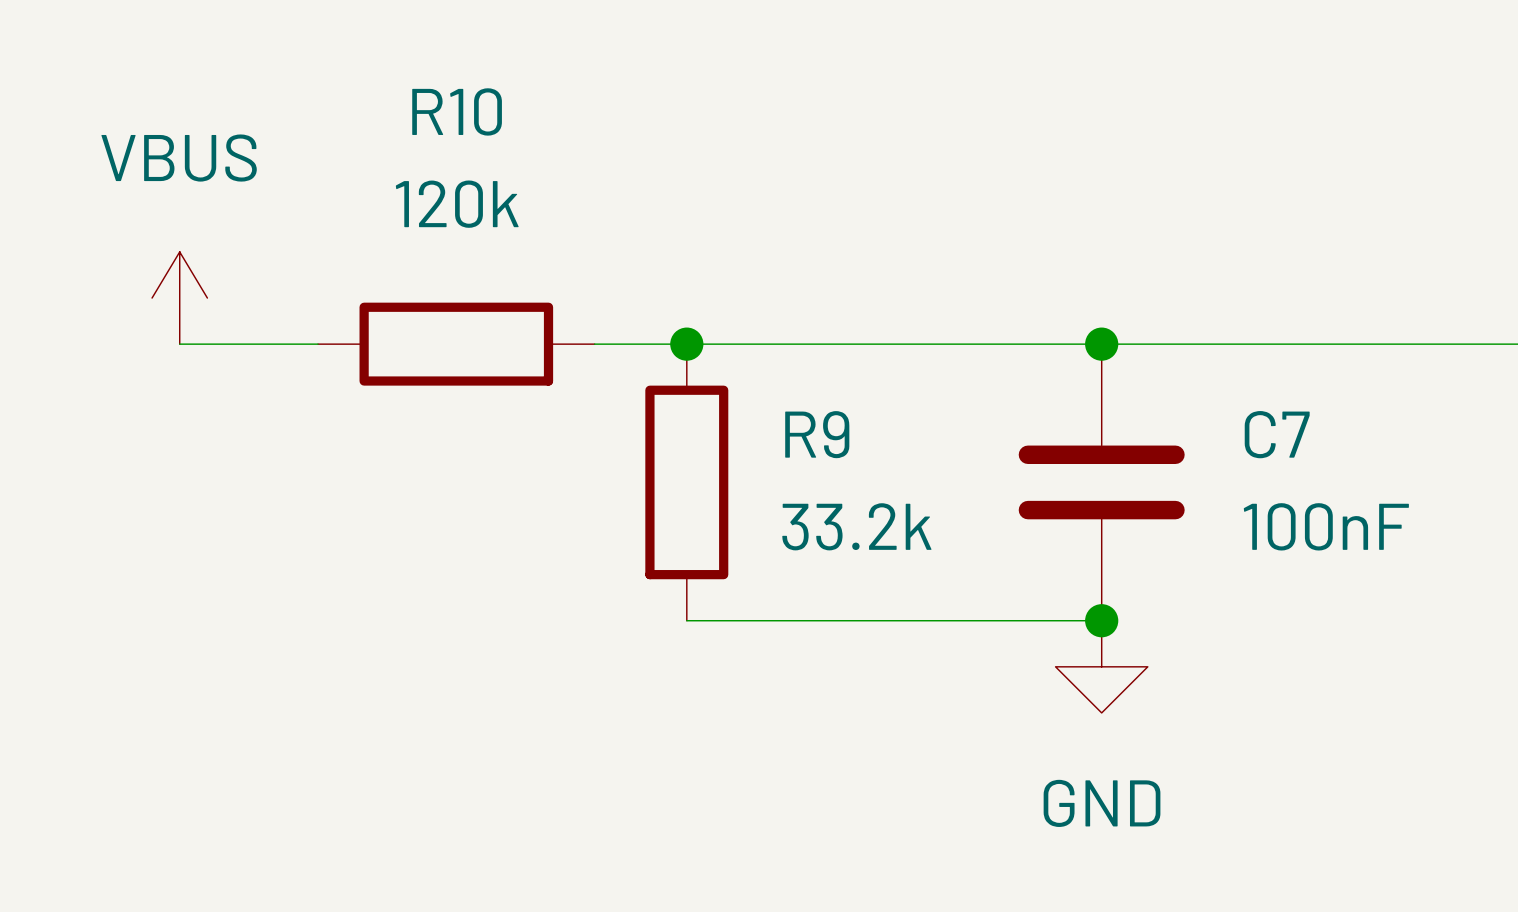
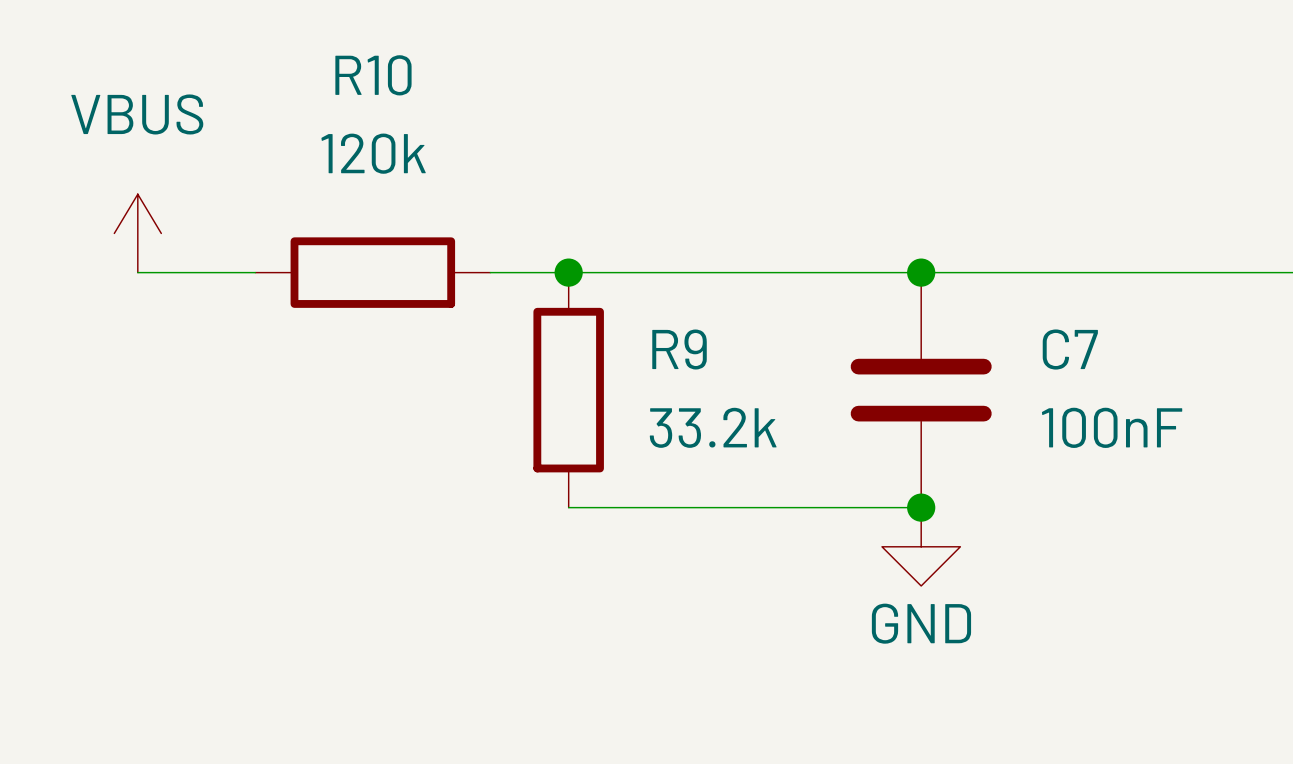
power symbol text position: GND (1102, 803) -> GND (921, 623)

